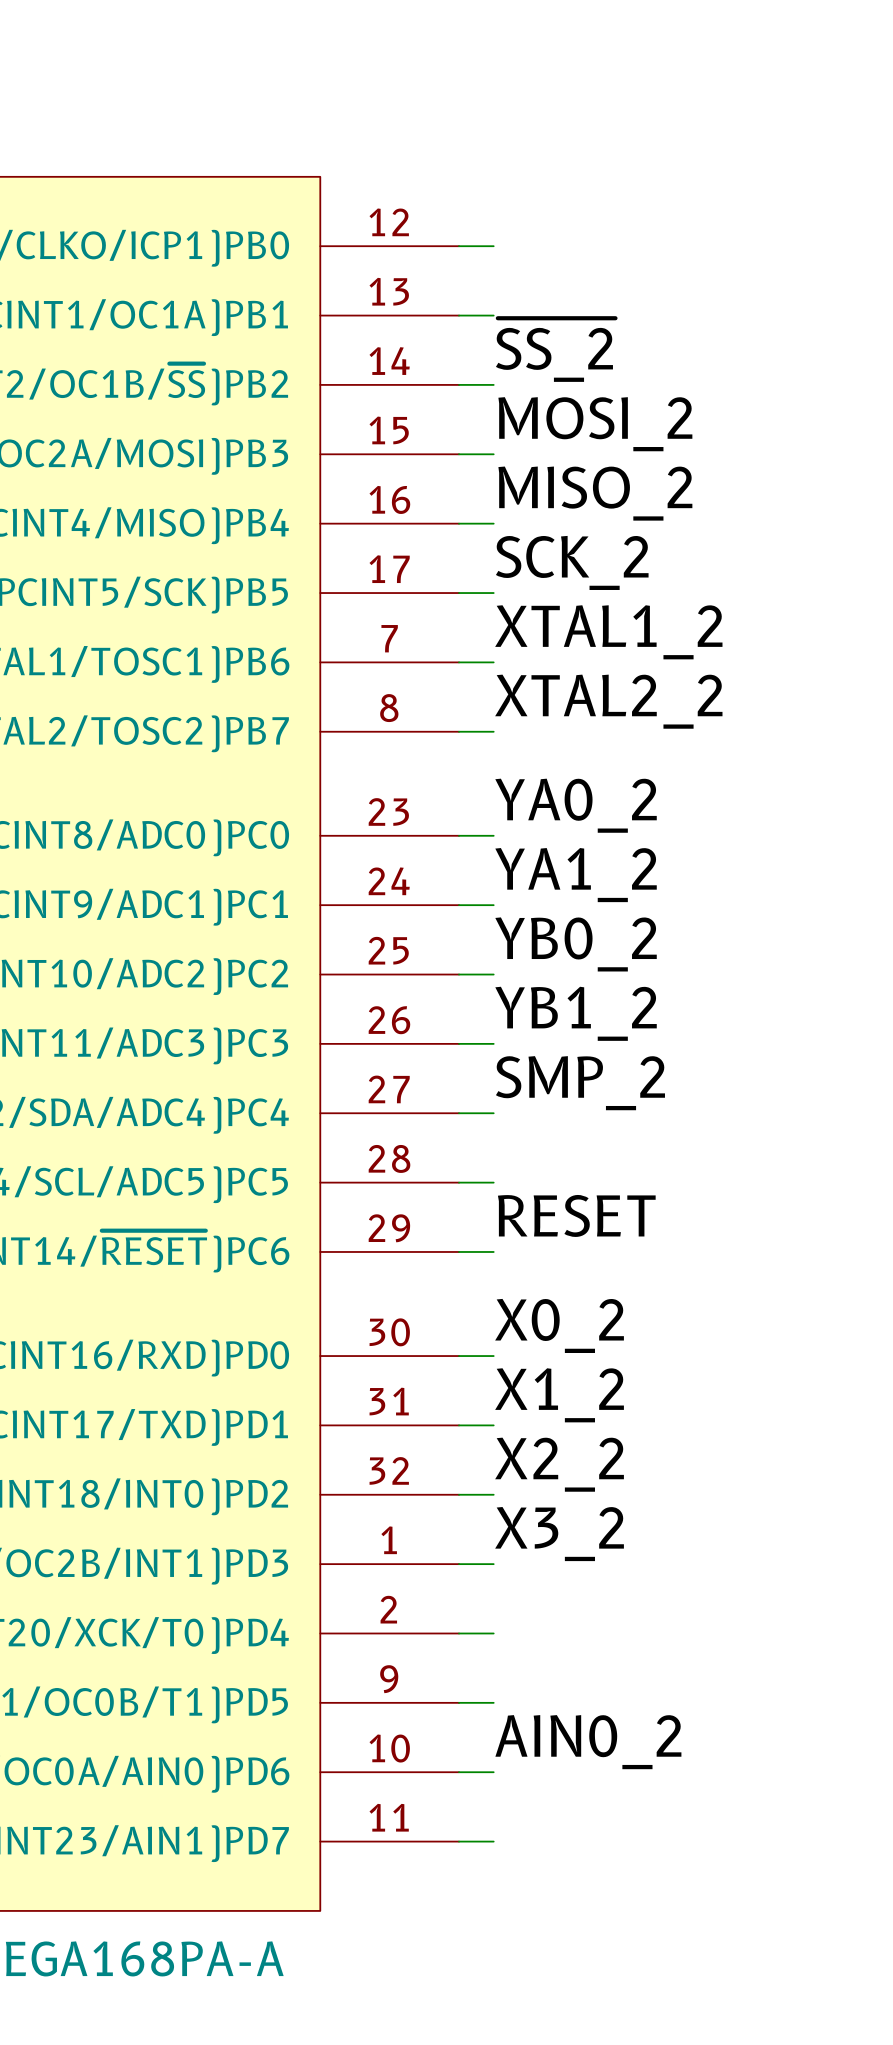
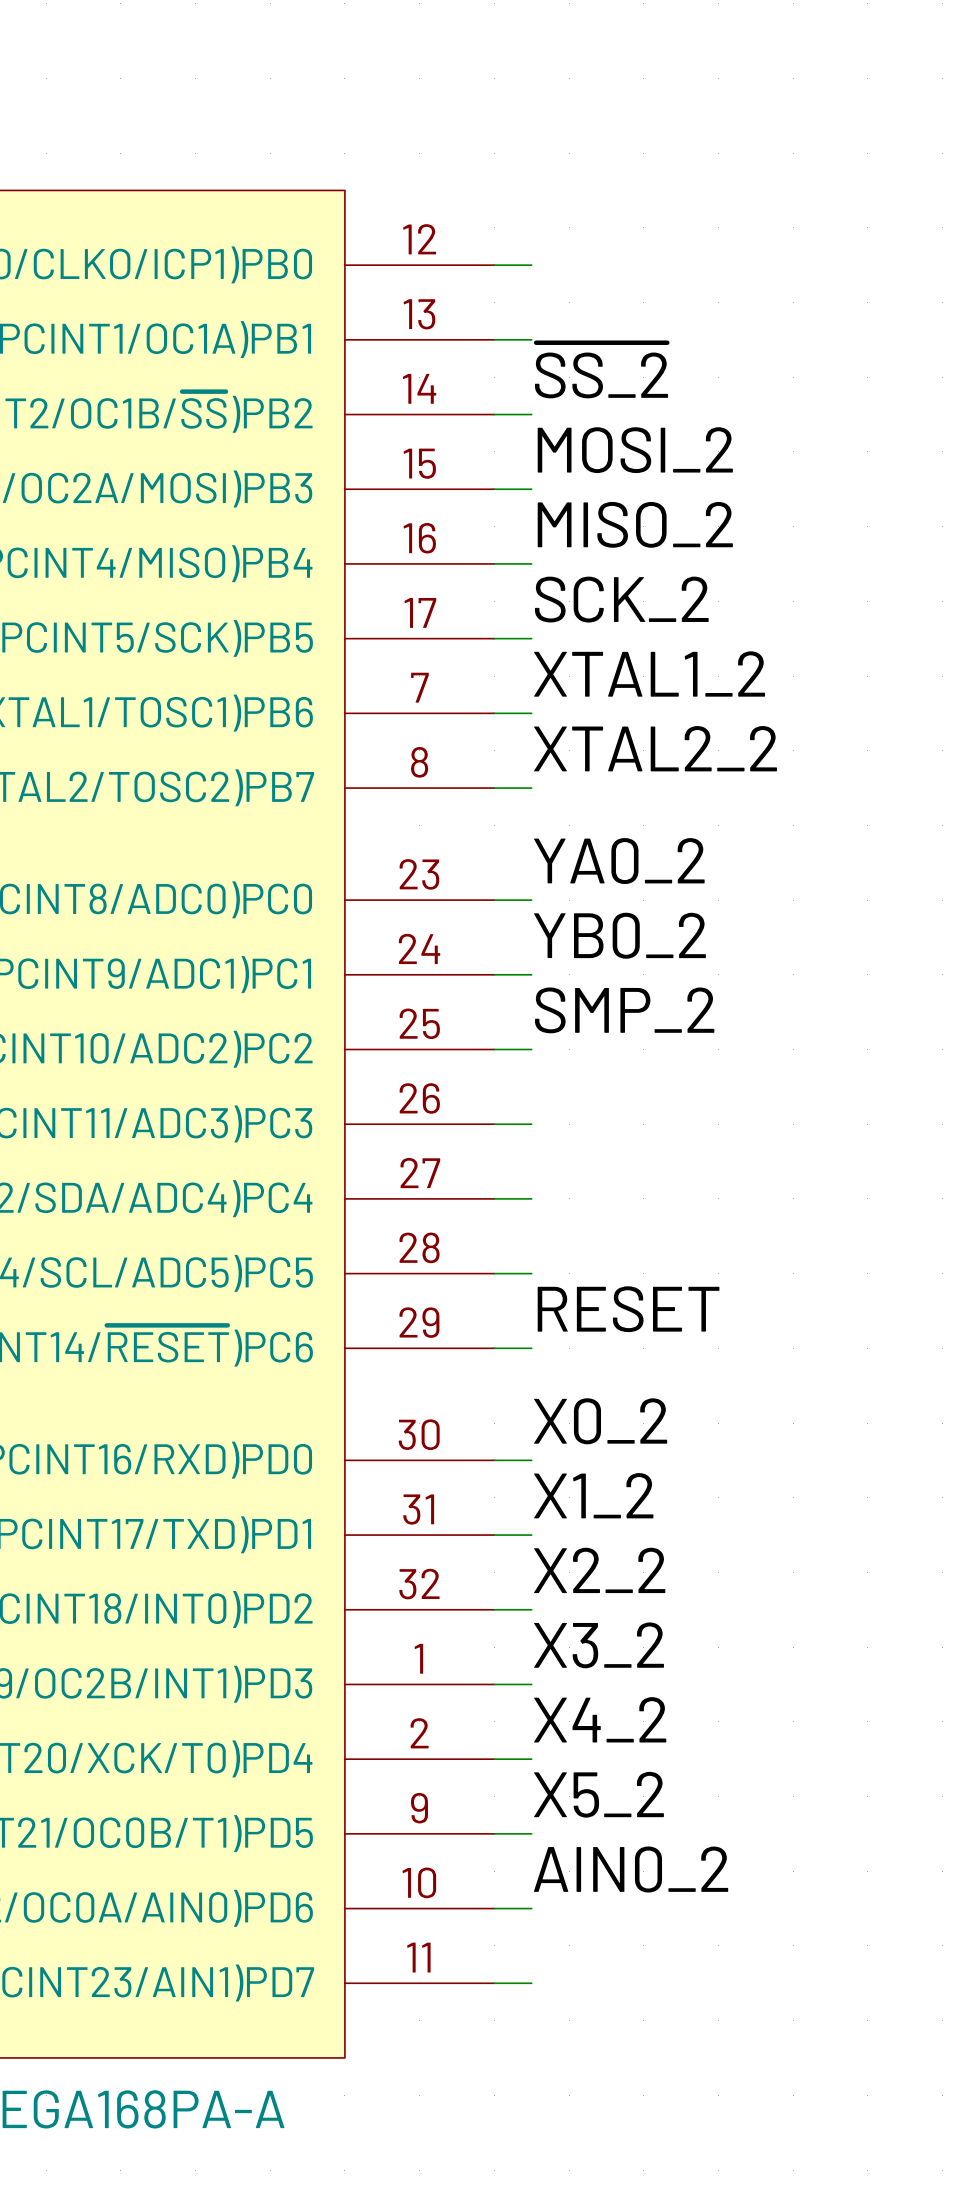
label: YA1_2 (576, 875) -> YB0_2 (619, 935)
label: YB0_2 (576, 944) -> SMP_2 (624, 1010)
label: YB1_2 (576, 1013) -> none
label: SMP_2 (580, 1083) -> none
label: none -> X4_2 (600, 1719)
label: none -> X5_2 (598, 1794)

